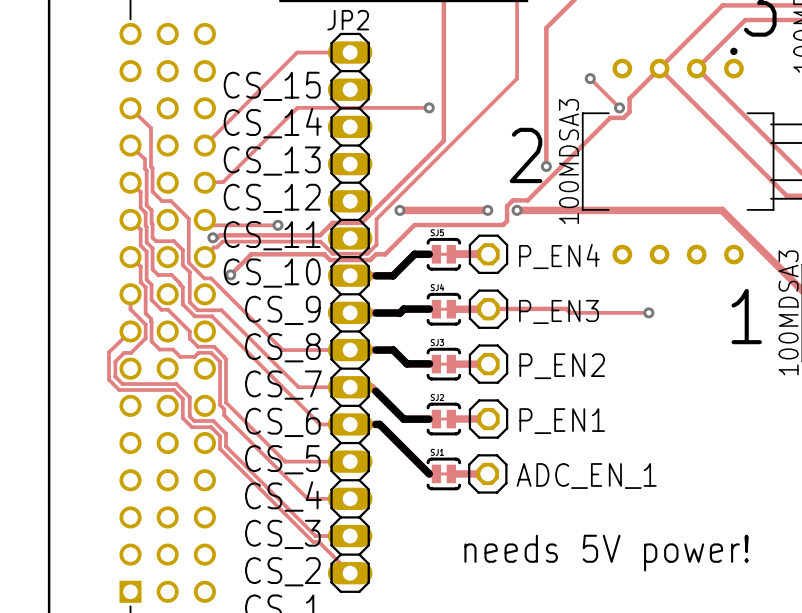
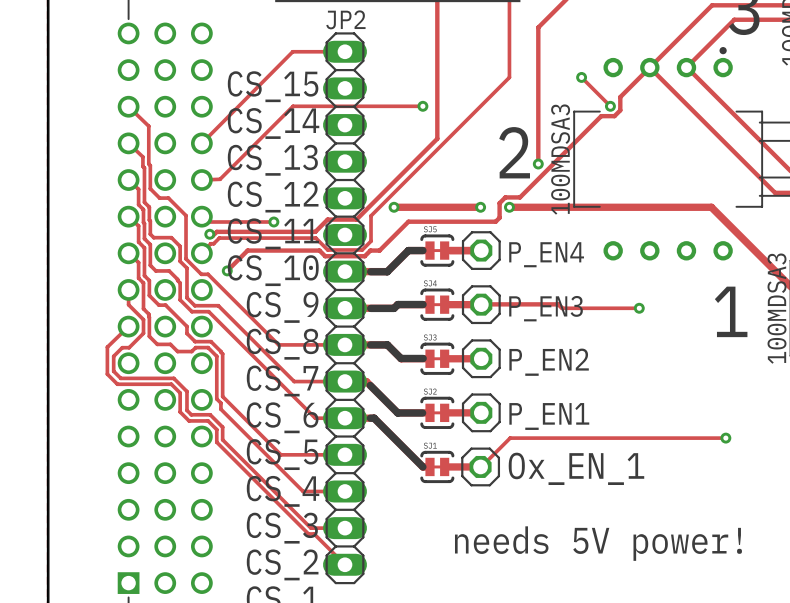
track: none -> (725, 438) (510, 438) (480, 466)
via: none -> (725, 438)
text: ADC_EN_1 (586, 476) -> Ox_EN_1 (576, 468)

